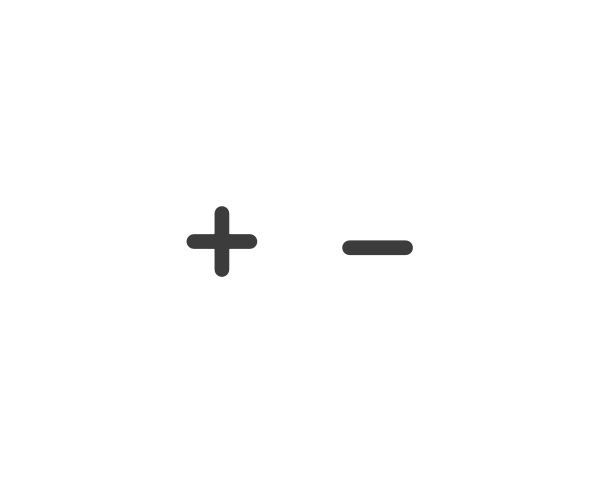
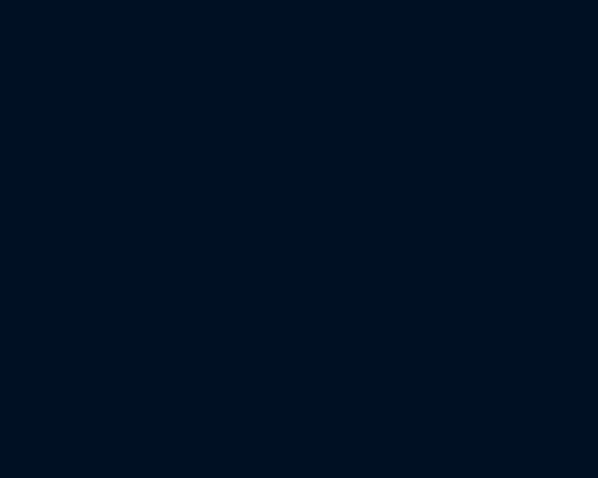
text: + (221, 241) -> none
text: - (377, 247) -> none

